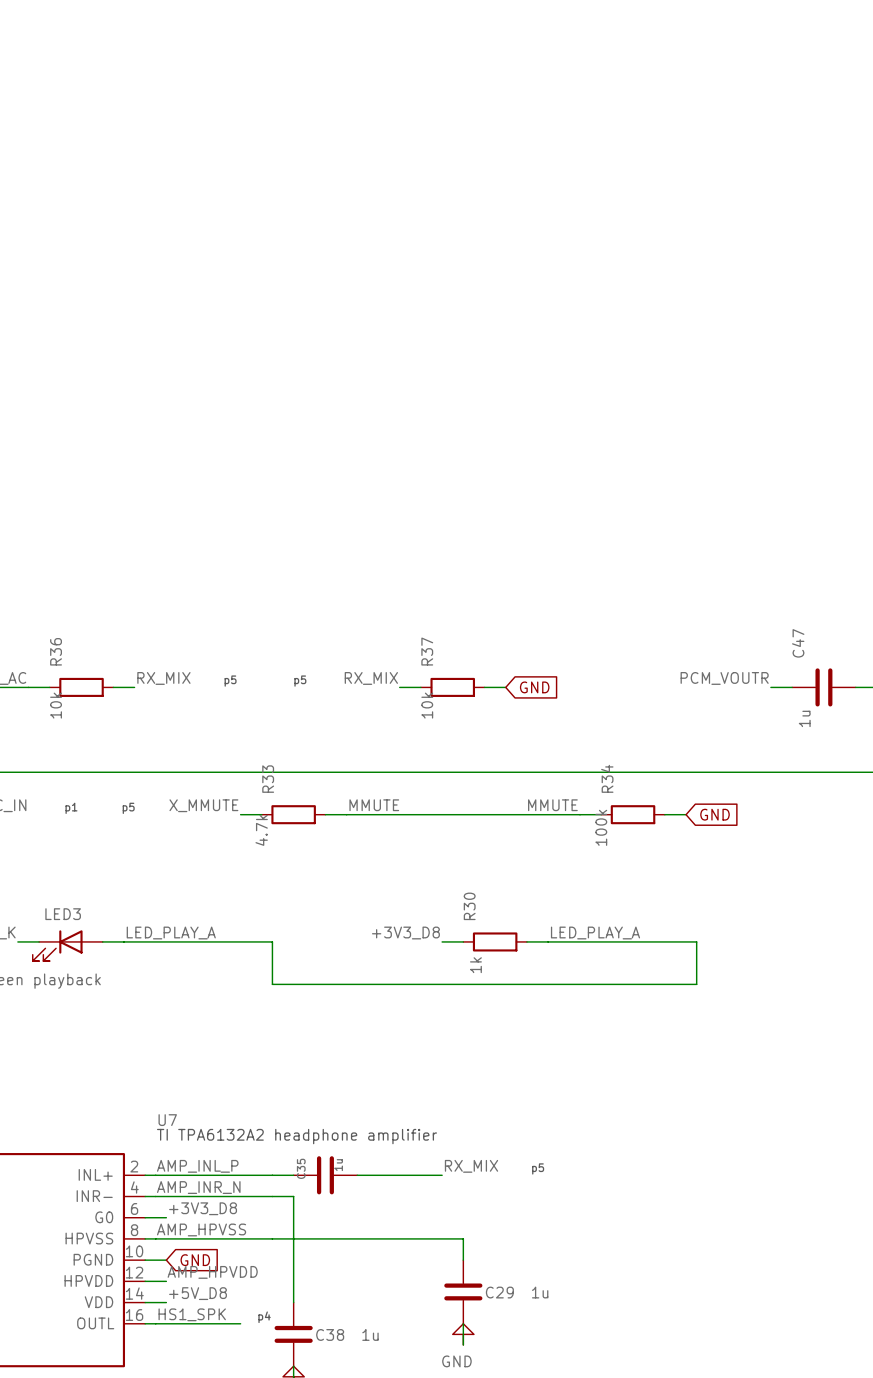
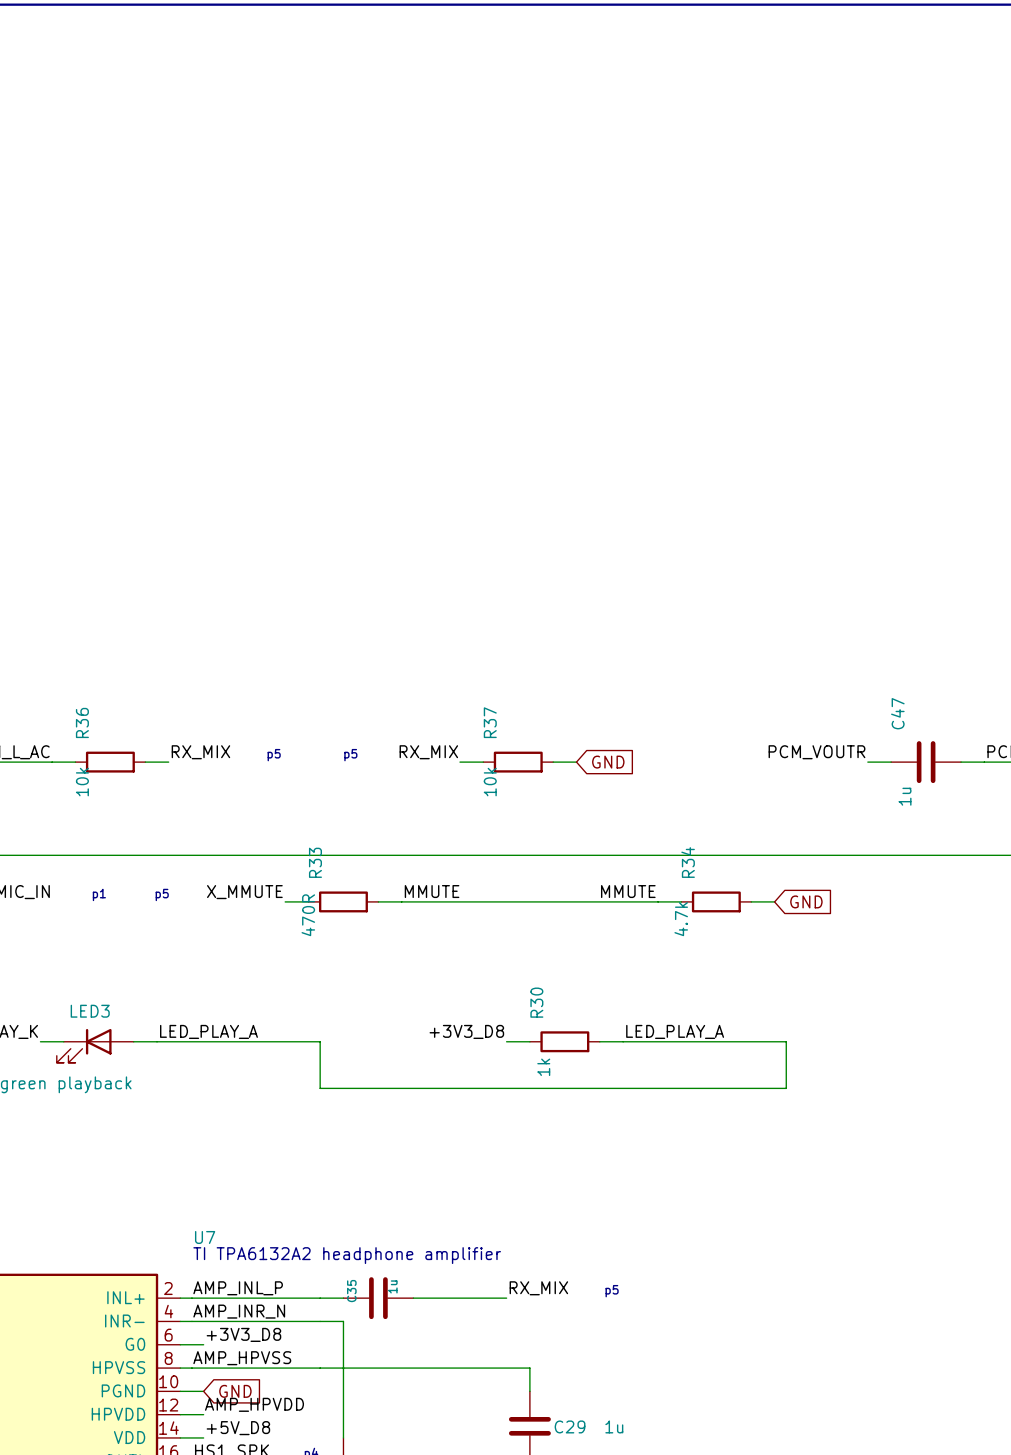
R34 value: 100k (601, 827) -> 4.7k (681, 919)
R33 value: 4.7k (261, 830) -> 470R (308, 915)

